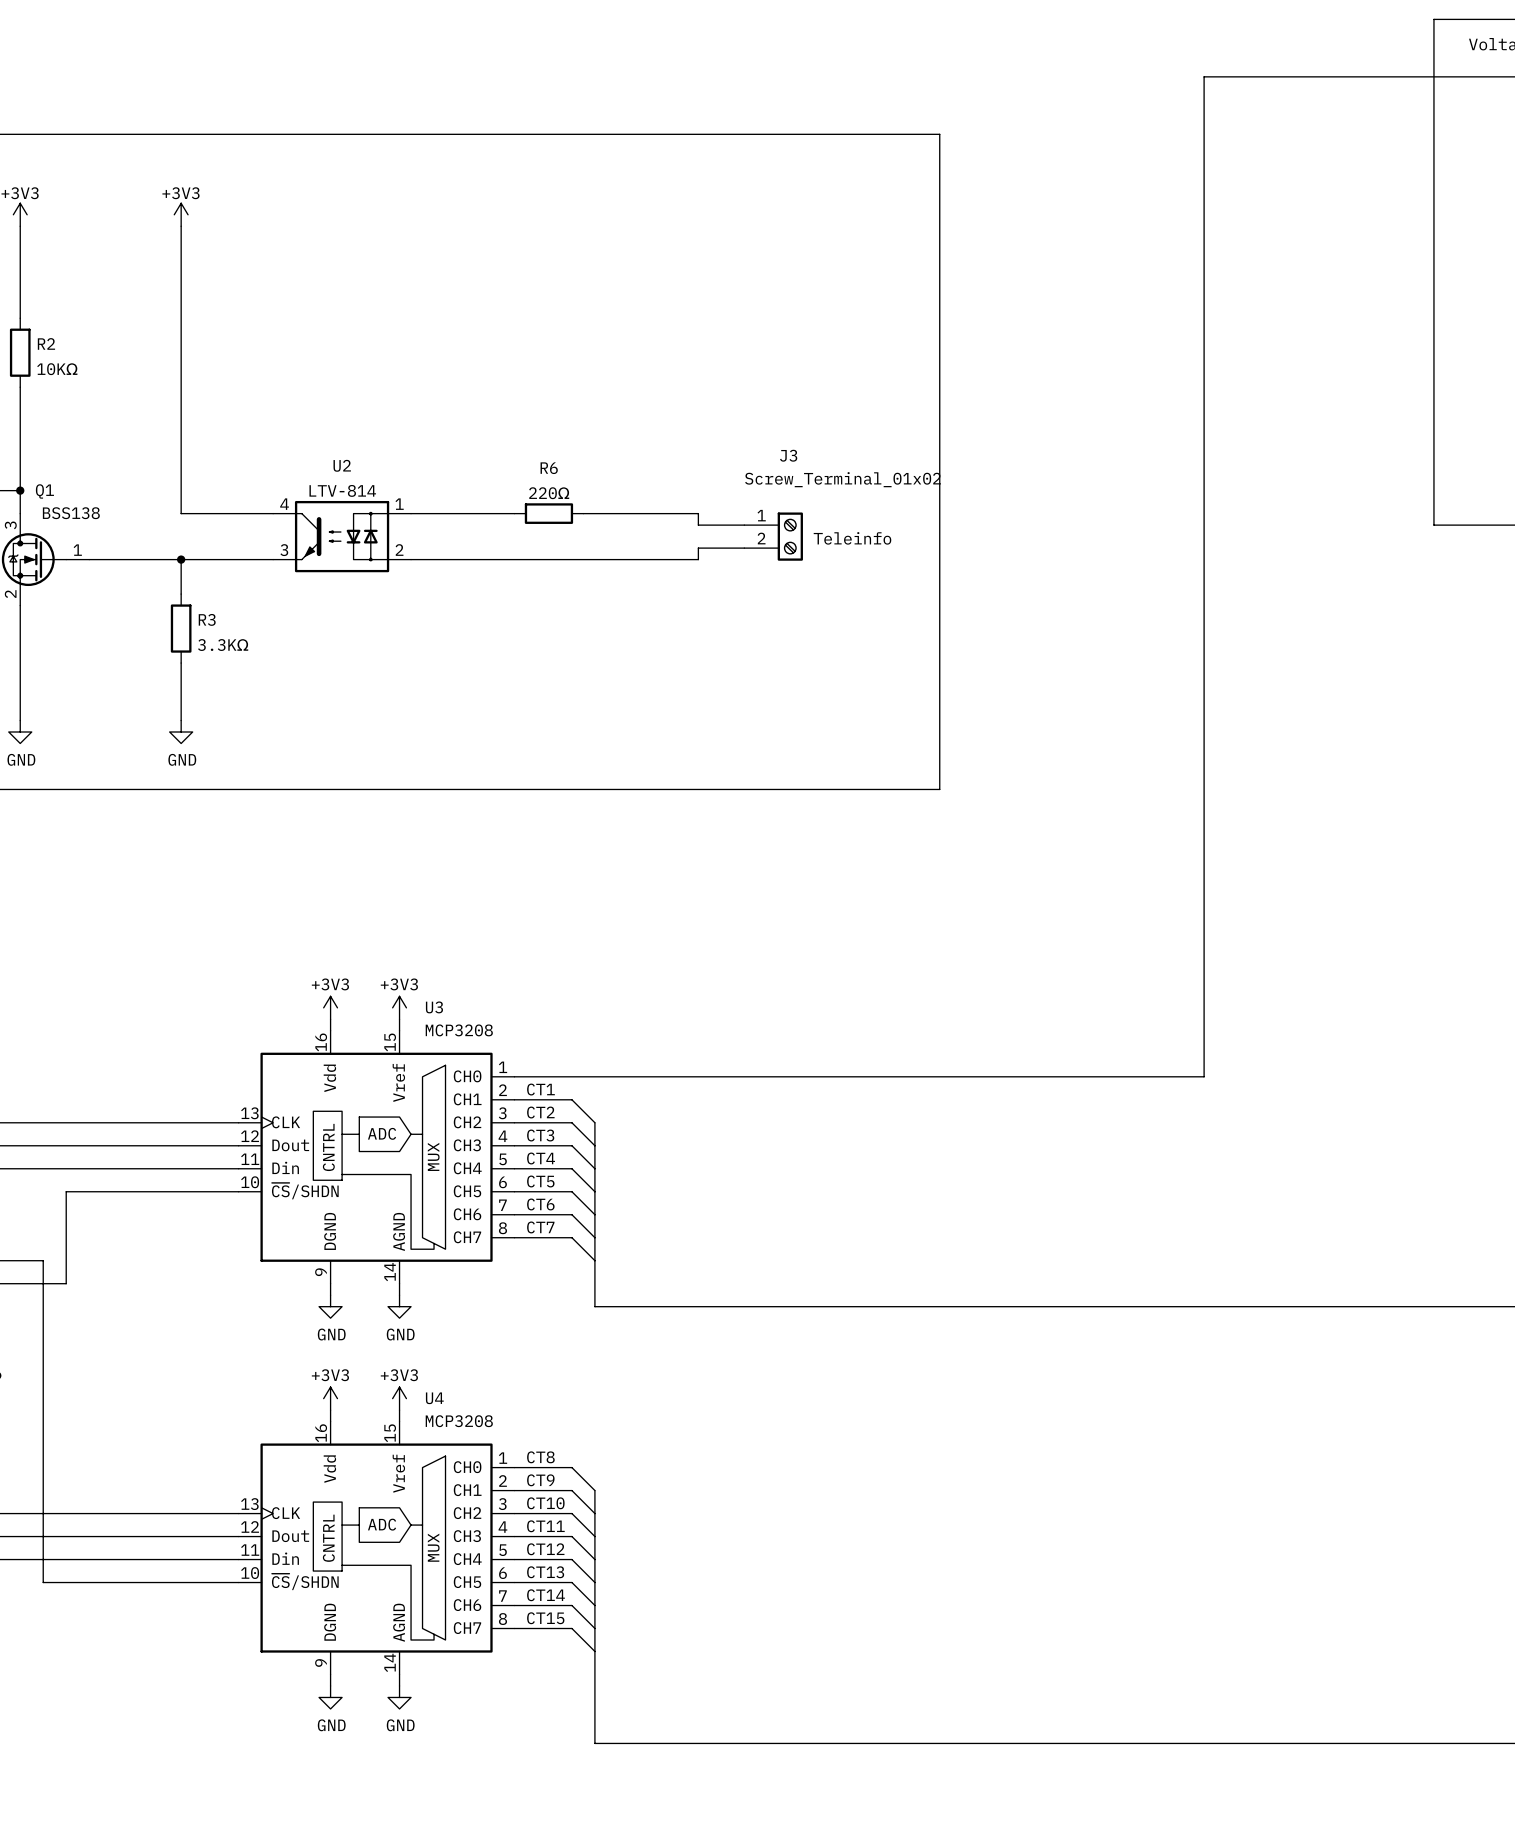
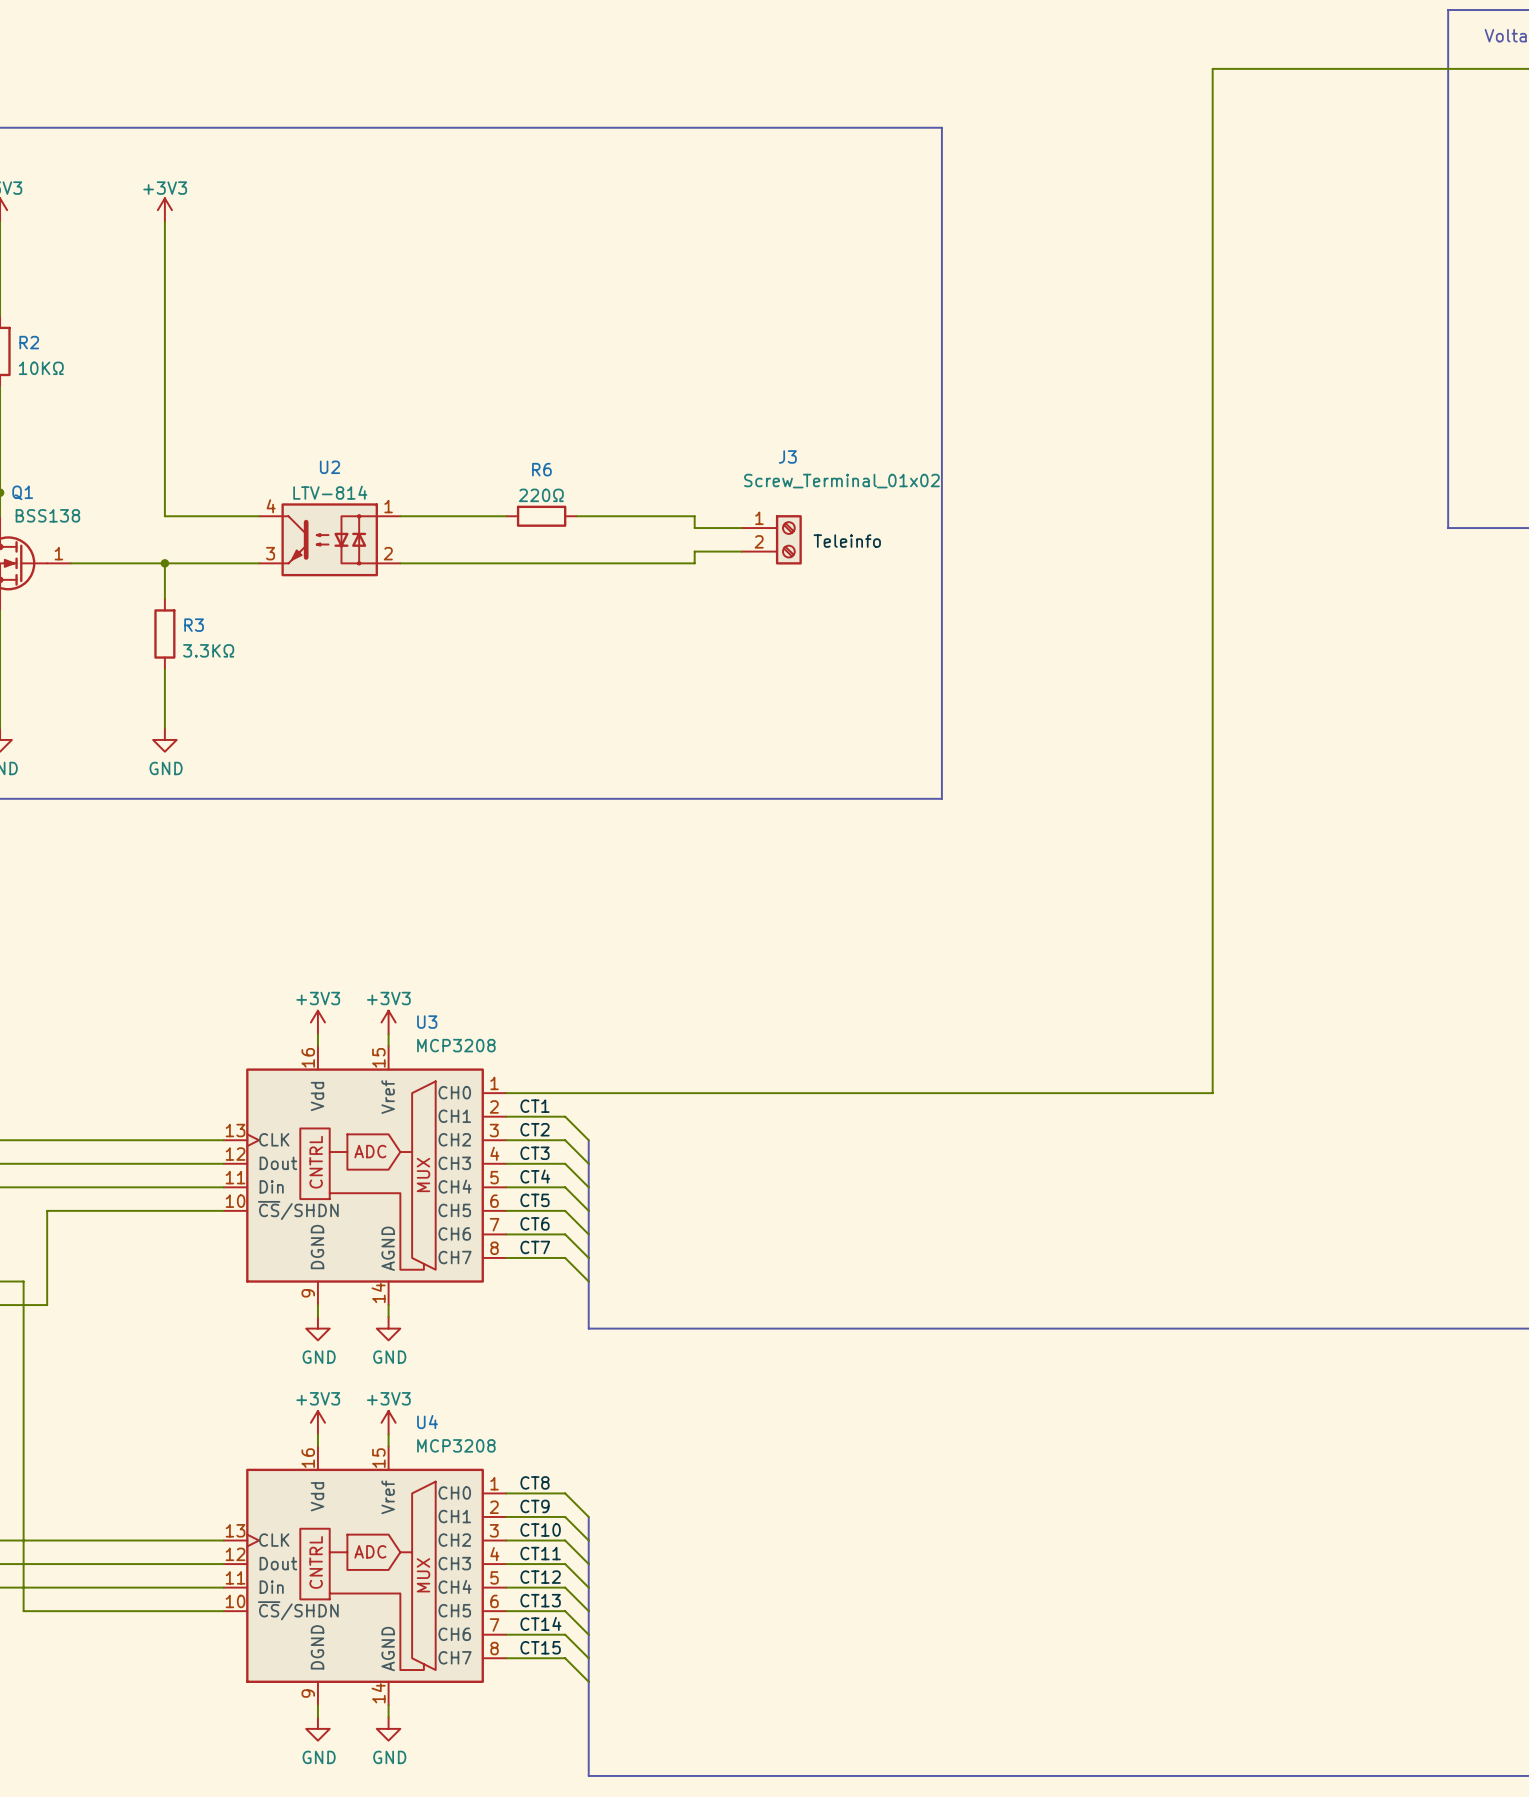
label: none -> Teleinfo (847, 541)
text: Teleinfo (852, 538) -> none

